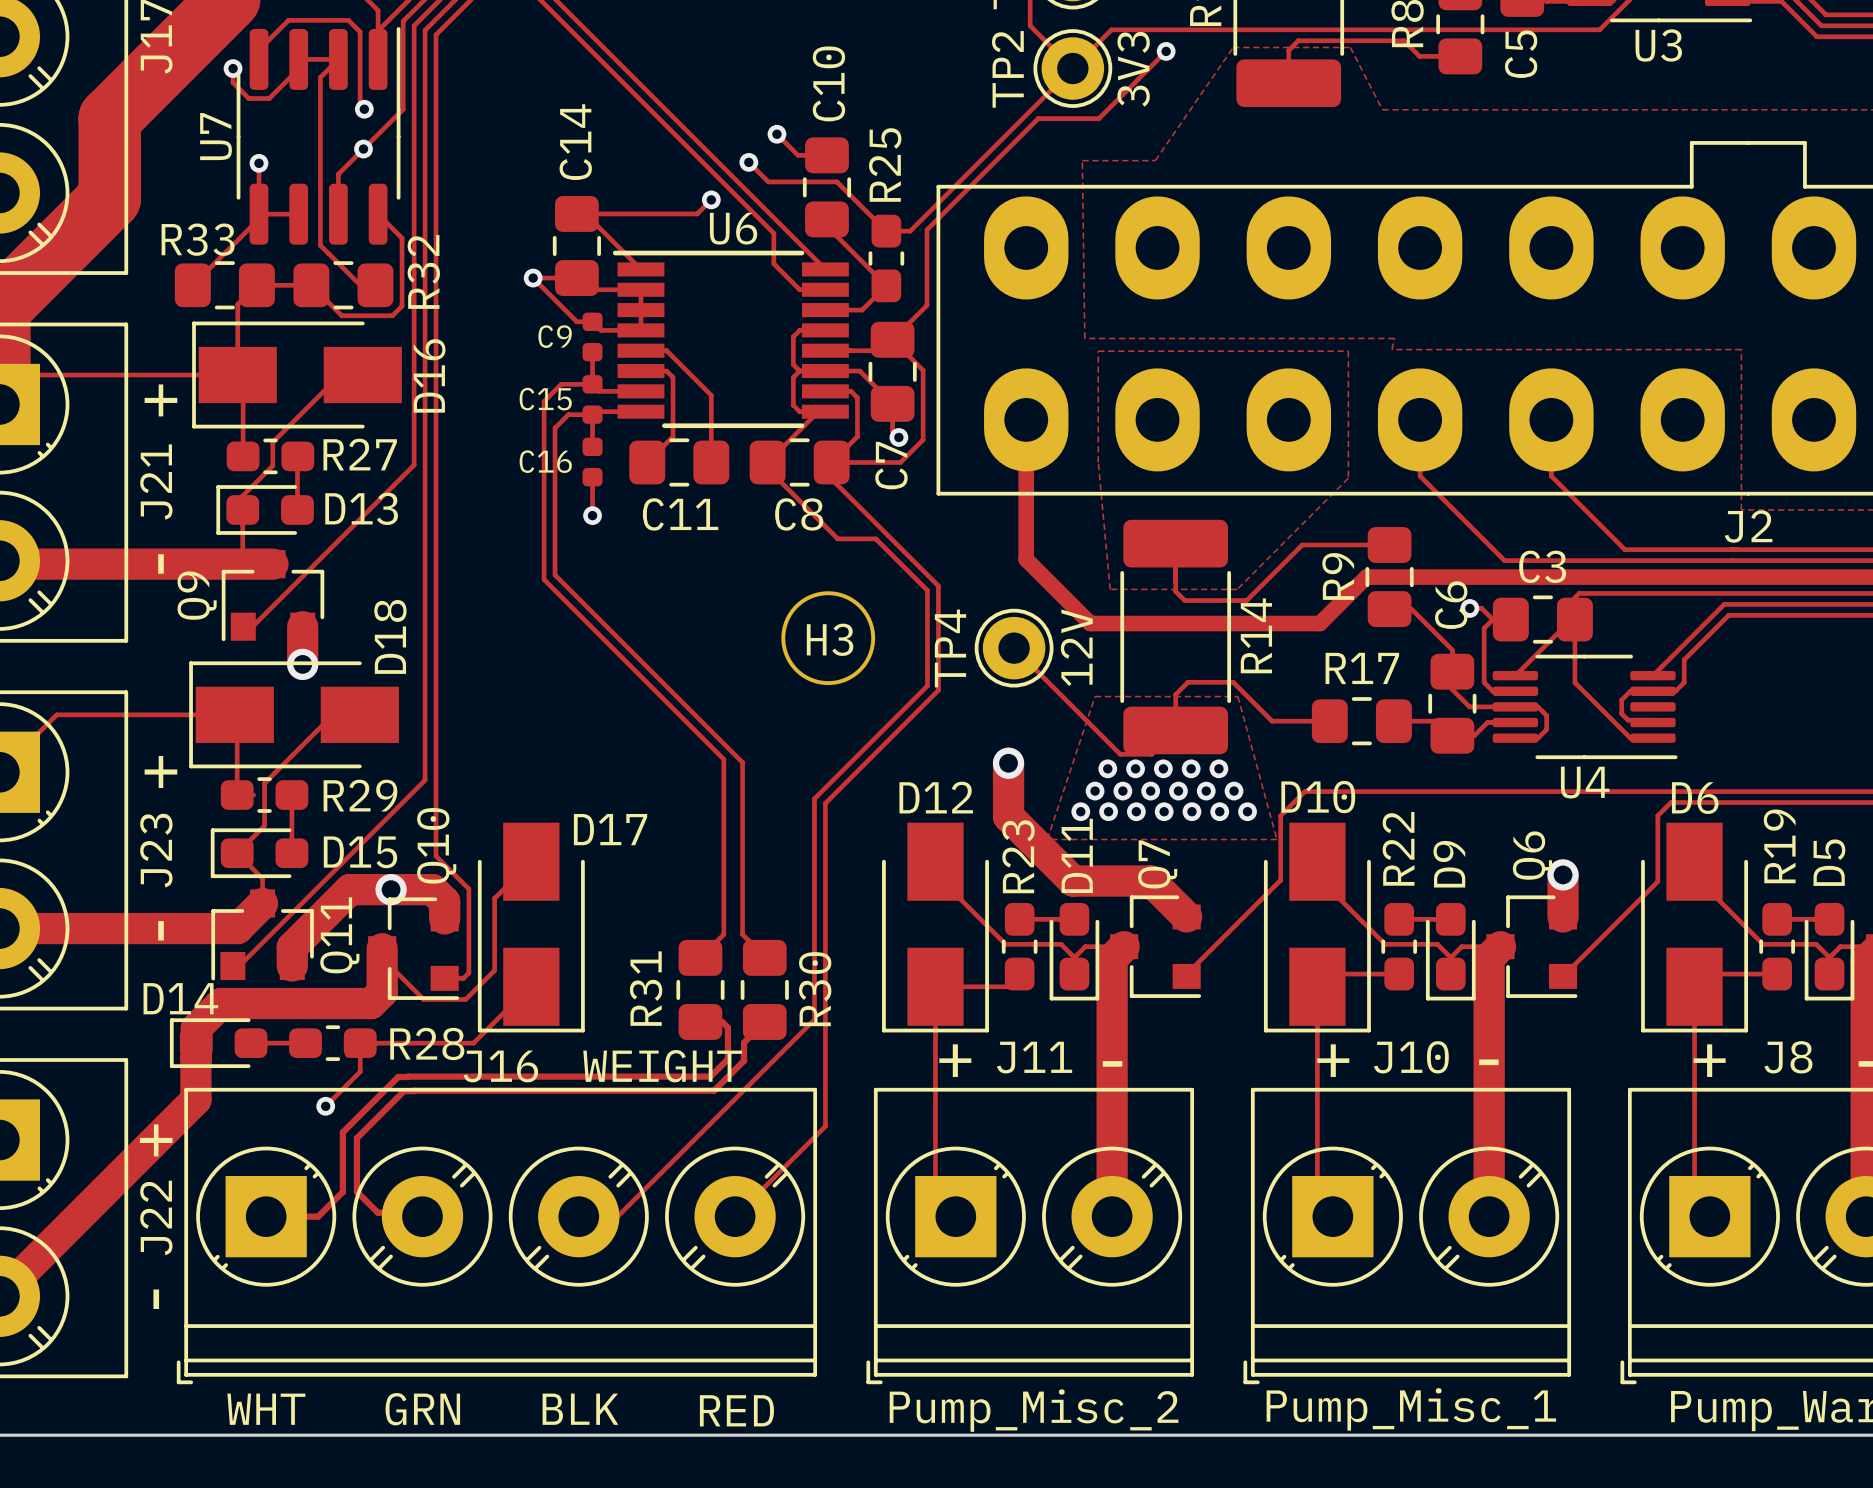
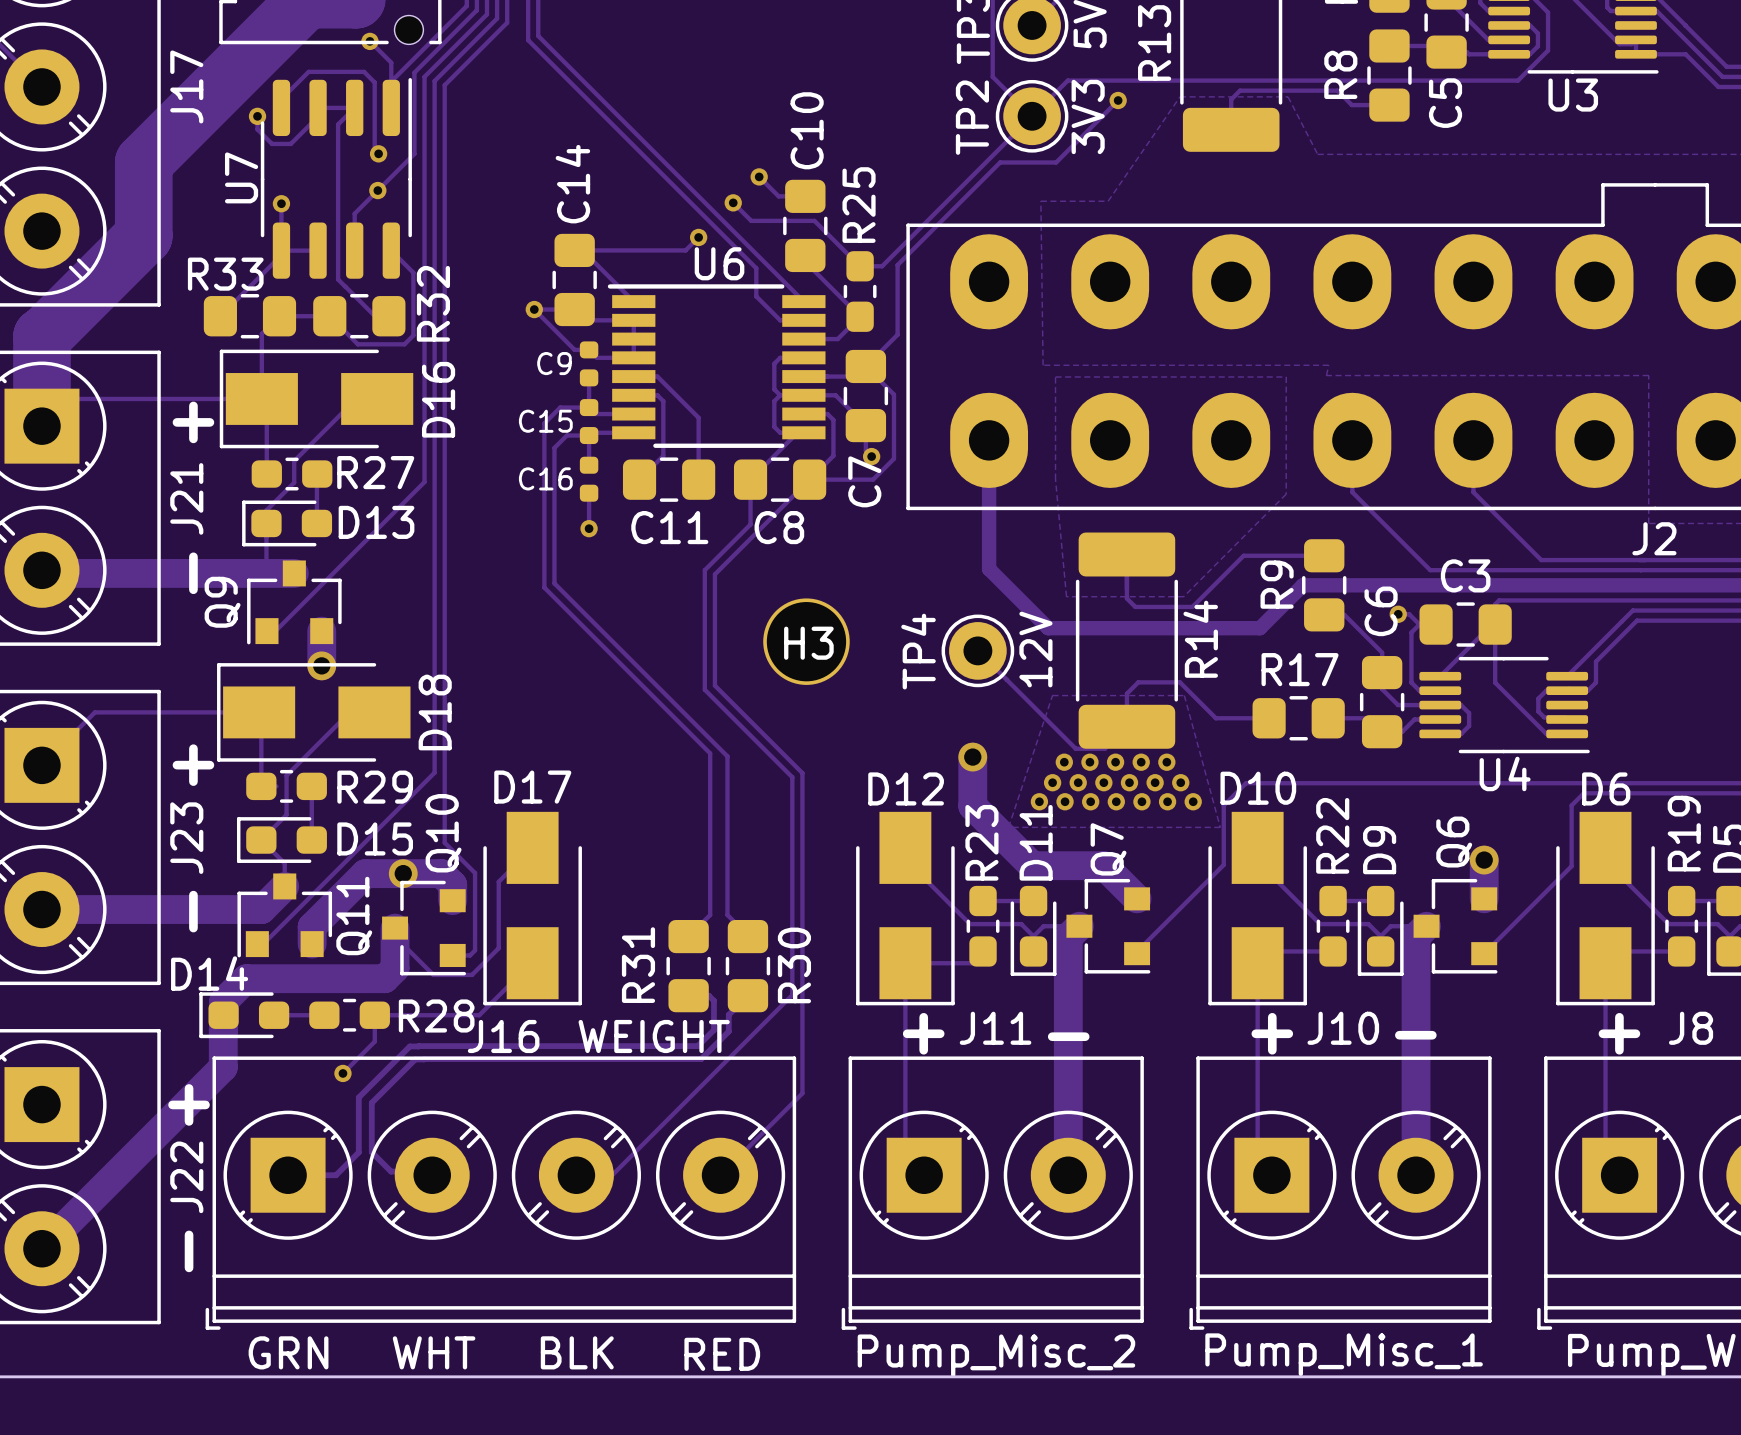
track: (831, 462) (831, 479) (938, 585) (938, 690) (825, 803) (825, 1126) (823, 1127) -> (809, 479) (714, 574) (714, 685) (802, 773) (802, 1093)
track: (767, 468) (837, 538) (875, 538) (927, 590) (927, 685) (814, 798) (814, 1019) (812, 1021) -> (750, 485) (750, 524) (704, 570) (704, 689) (792, 777) (792, 995)
D18 name position: D18 (390, 636) -> D18 (435, 712)
D17 name position: D17 (610, 829) -> D17 (532, 787)
text: WHT (266, 1409) -> GRN (288, 1352)
text: GRN (422, 1409) -> WHT (434, 1352)

